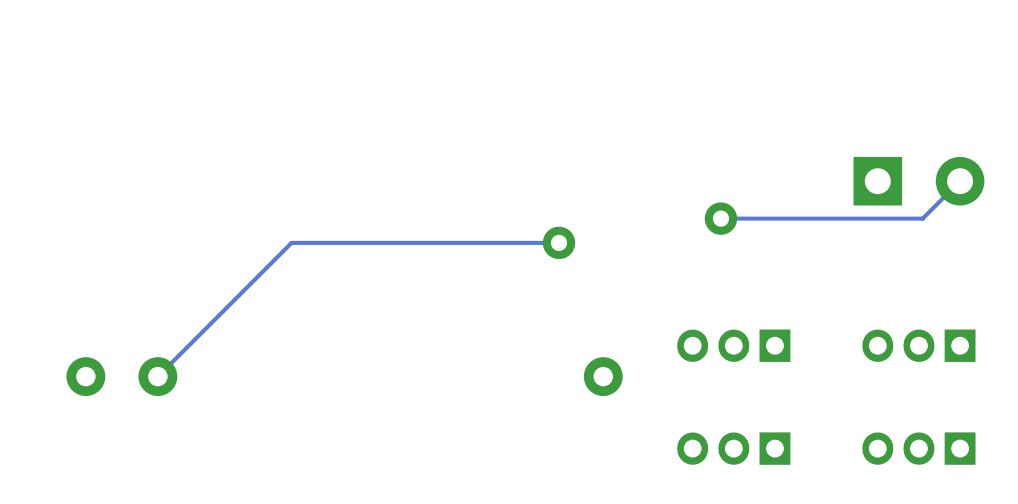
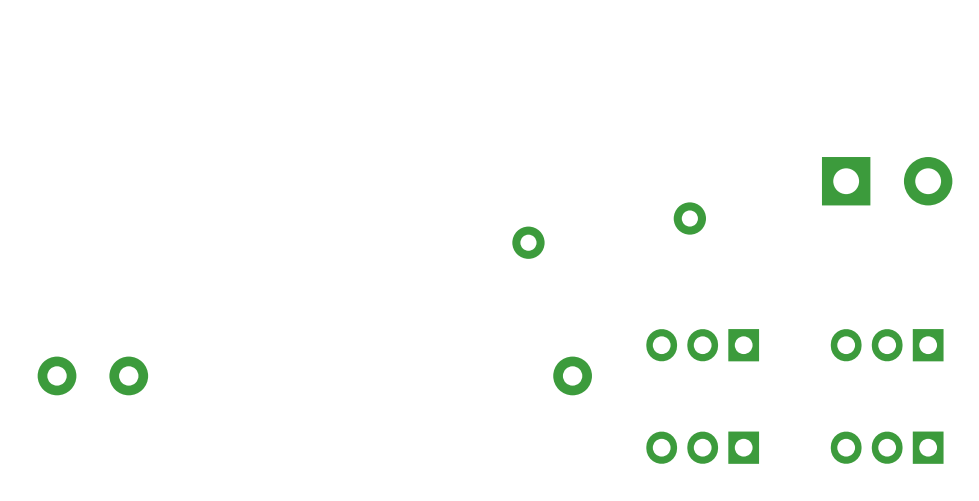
track: (960, 181) (922, 218) (720, 218) -> none
track: (558, 242) (291, 242) (157, 376) -> none

